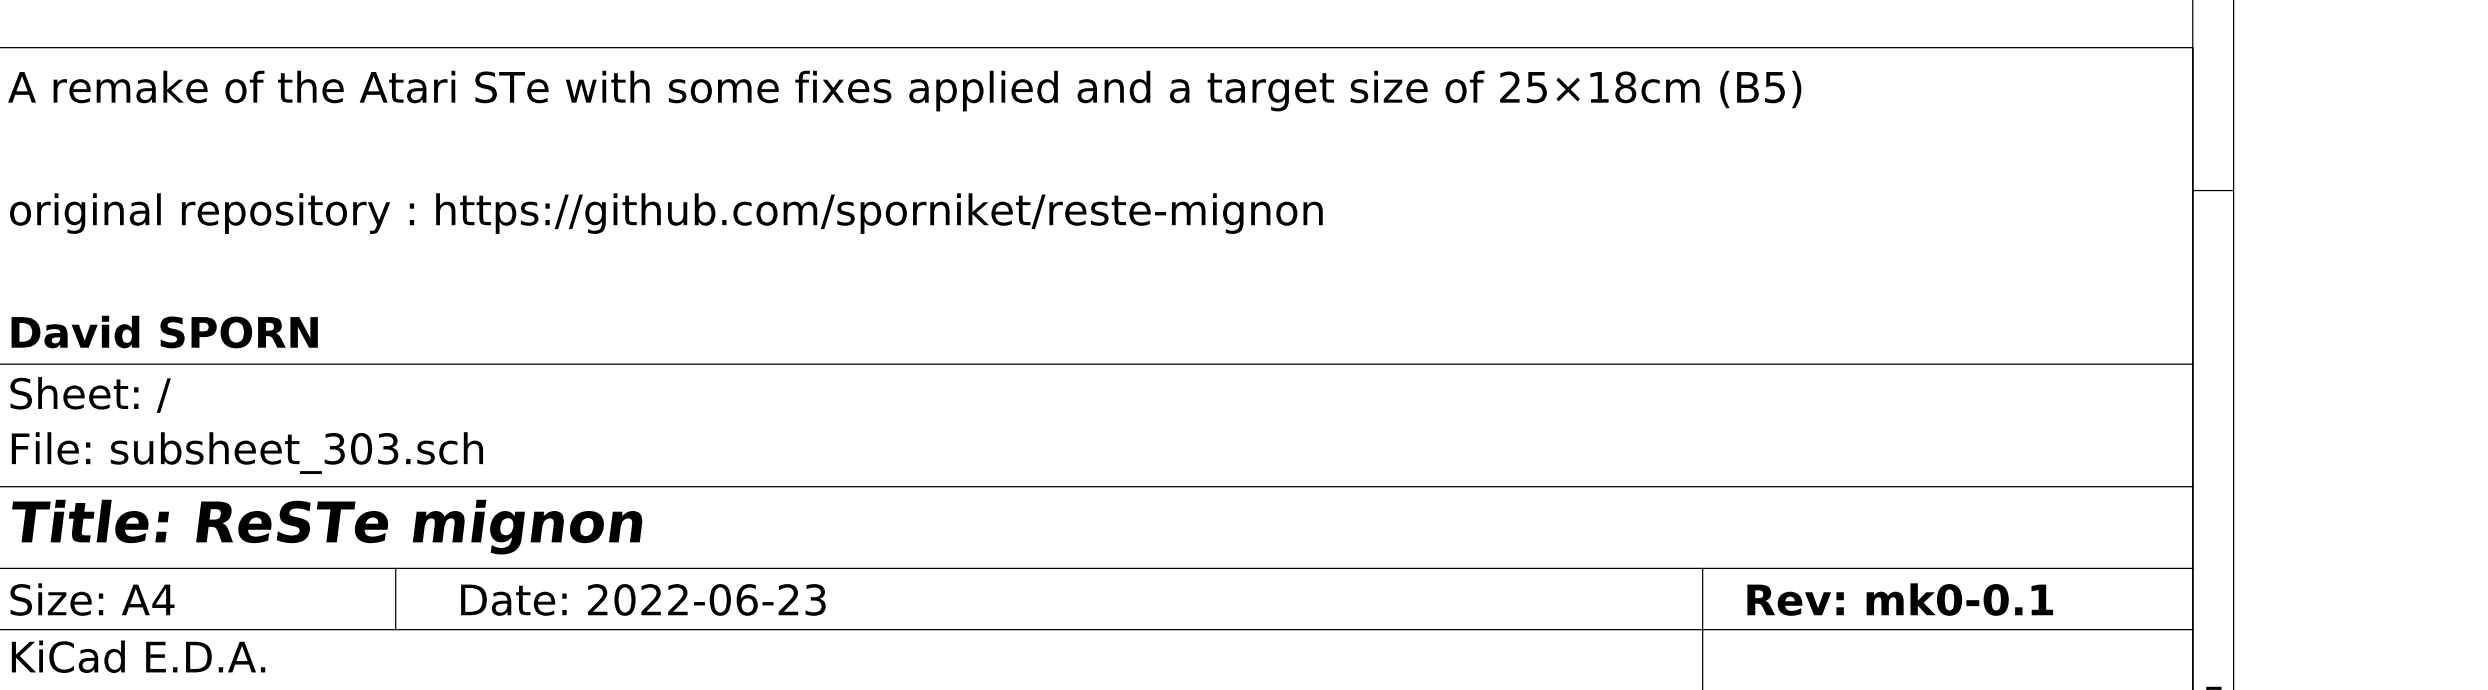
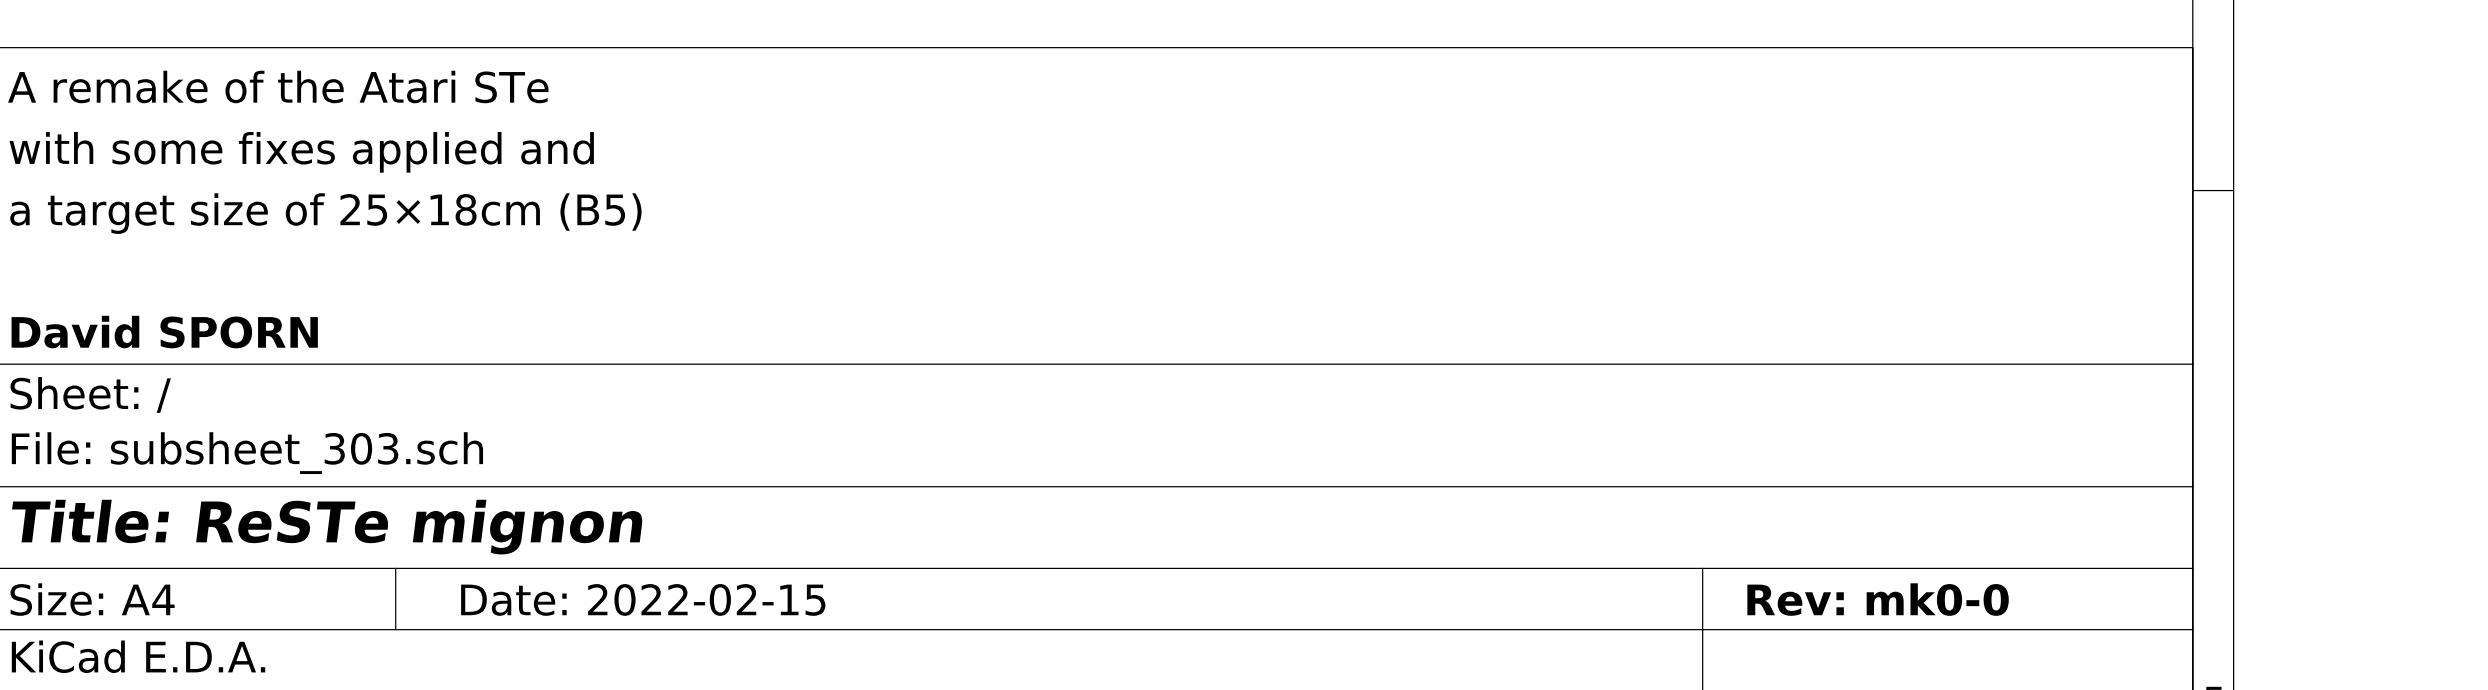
title block: A remake of the Atari STe with some fixes applied and a target size of 25×18cm (B5) (904, 91) -> A remake of the Atari STe (278, 87)
title block: none -> with some fixes applied and (301, 152)
title block: original repository : https://github.com/sporniket/reste-mignon (666, 213) -> a target size of 25×18cm (B5) (325, 213)
title block: Date: 2022-06-23 (643, 599) -> Date: 2022-02-15 (643, 599)
title block: Rev: mk0-0.1 (1900, 599) -> Rev: mk0-0 (1878, 599)

